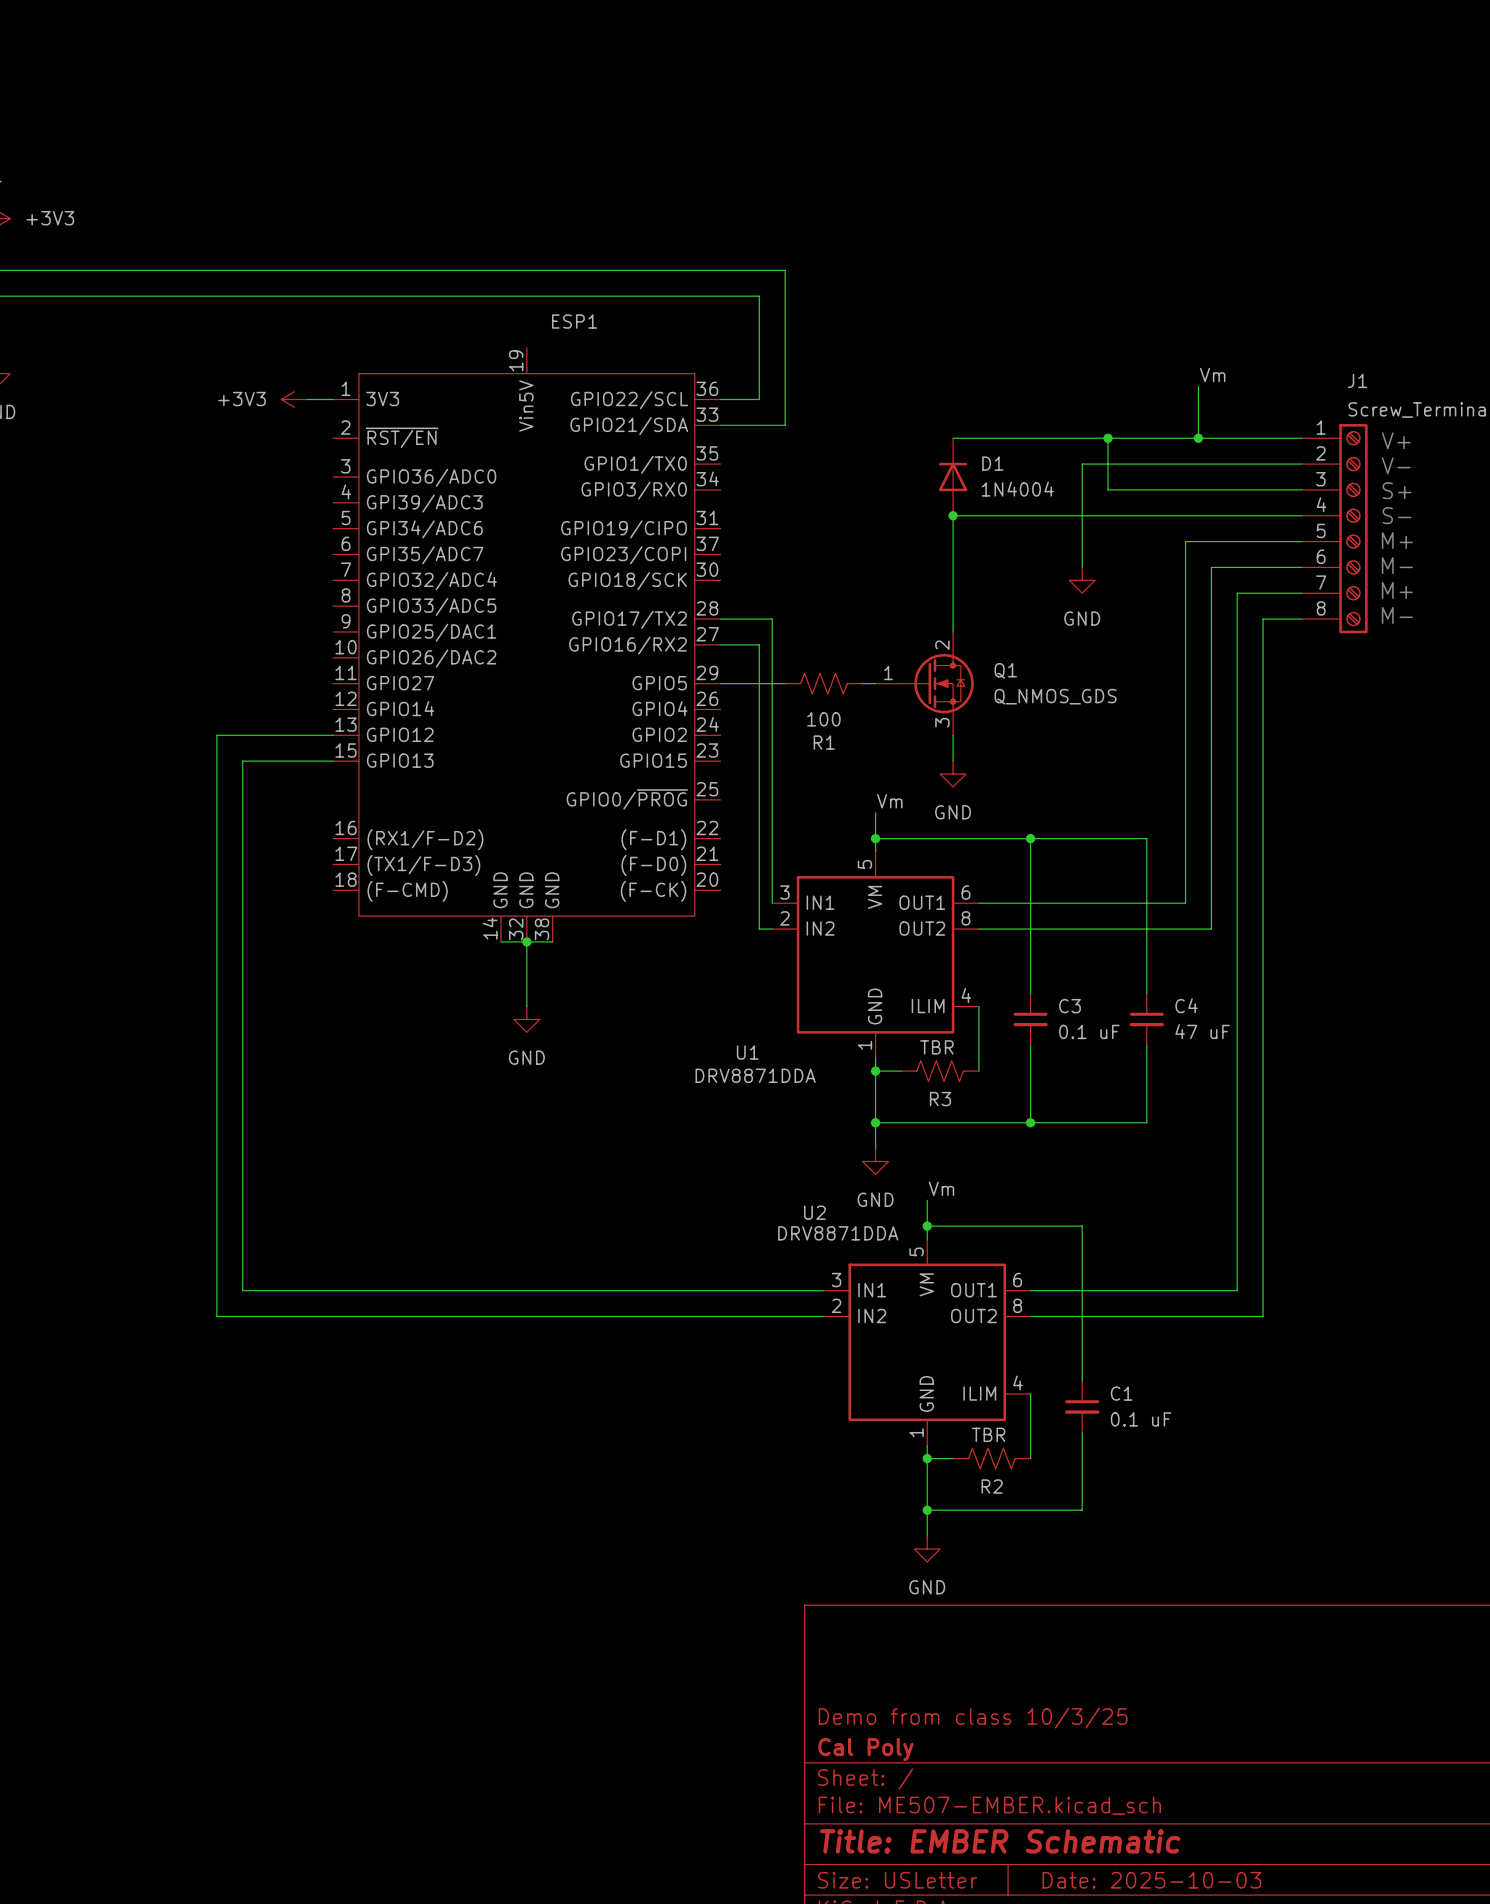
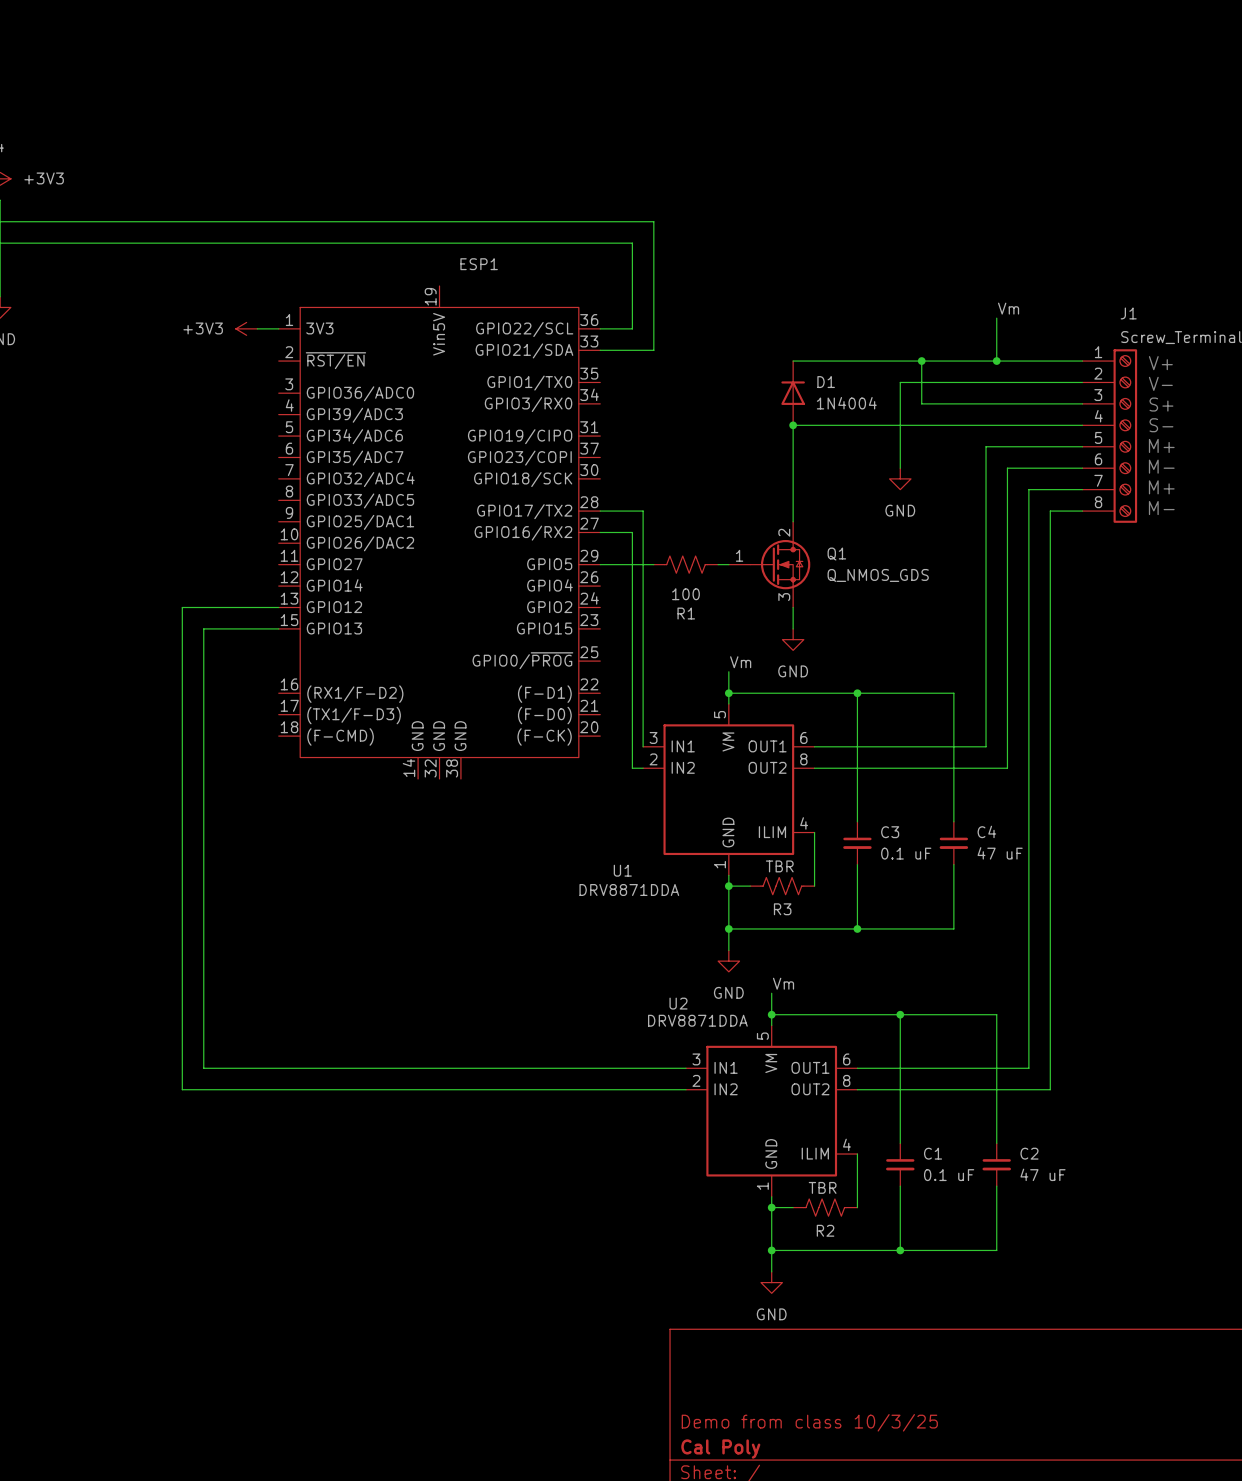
wire: (501, 941) (552, 941) -> none
wire: (526, 941) (526, 1006) -> none
junction: (526, 941) -> none
power symbol: GND (526, 1019) -> none
wire: none -> (900, 1014) (996, 1014) (996, 1143)
junction: none -> (900, 1014)
C2: none -> 47 uF (996, 1164)
wire: none -> (996, 1186) (996, 1250) (900, 1250)
junction: none -> (900, 1250)

